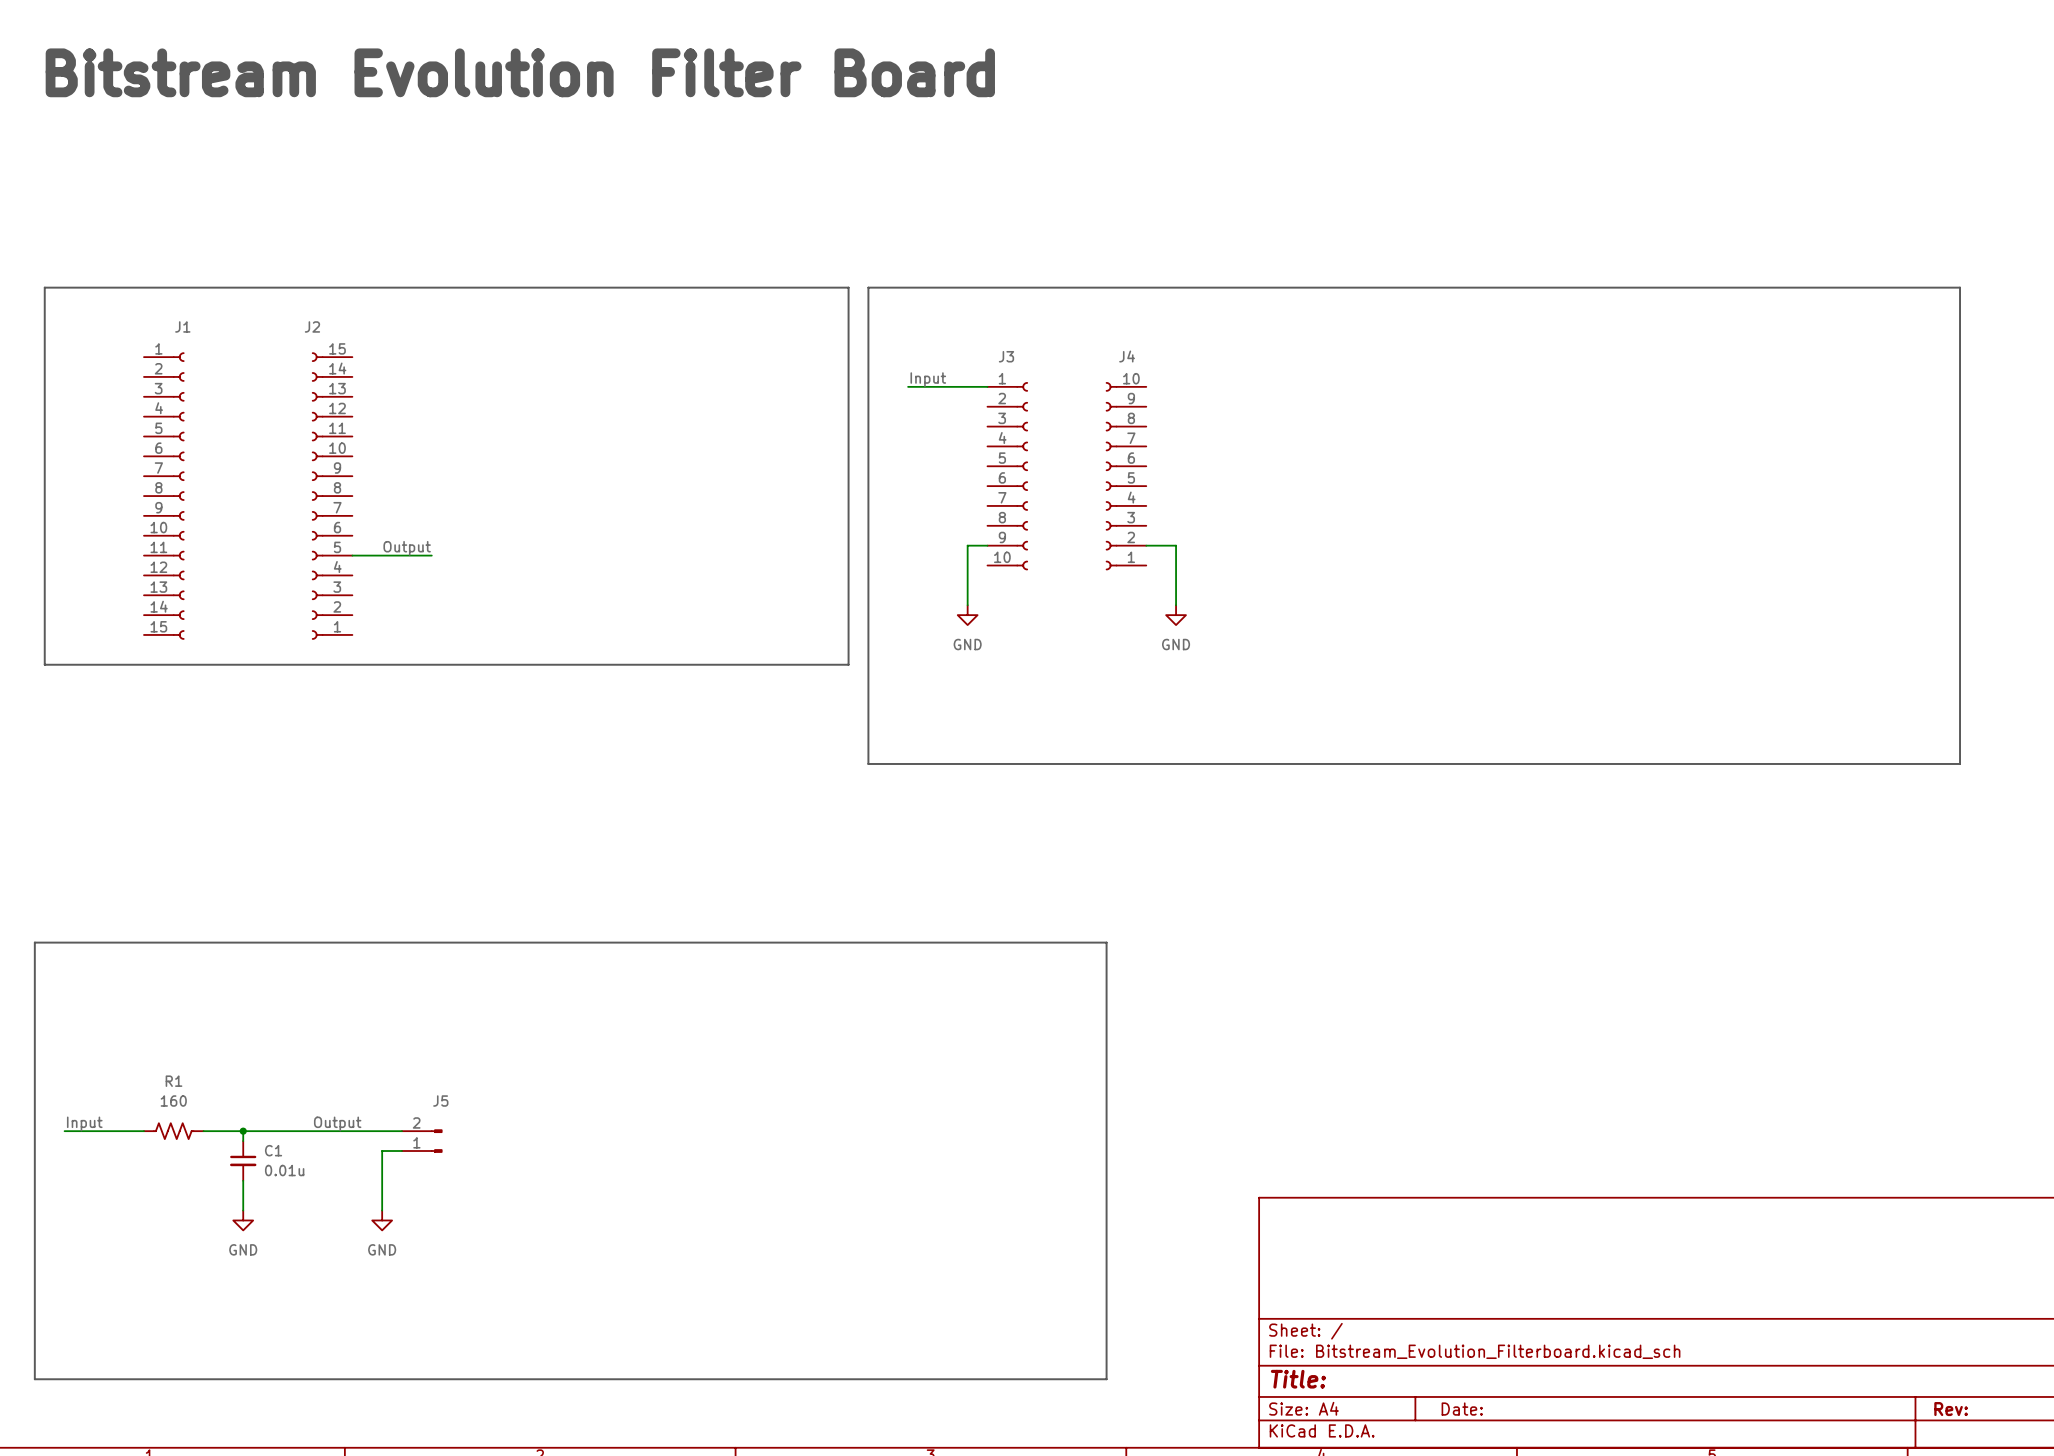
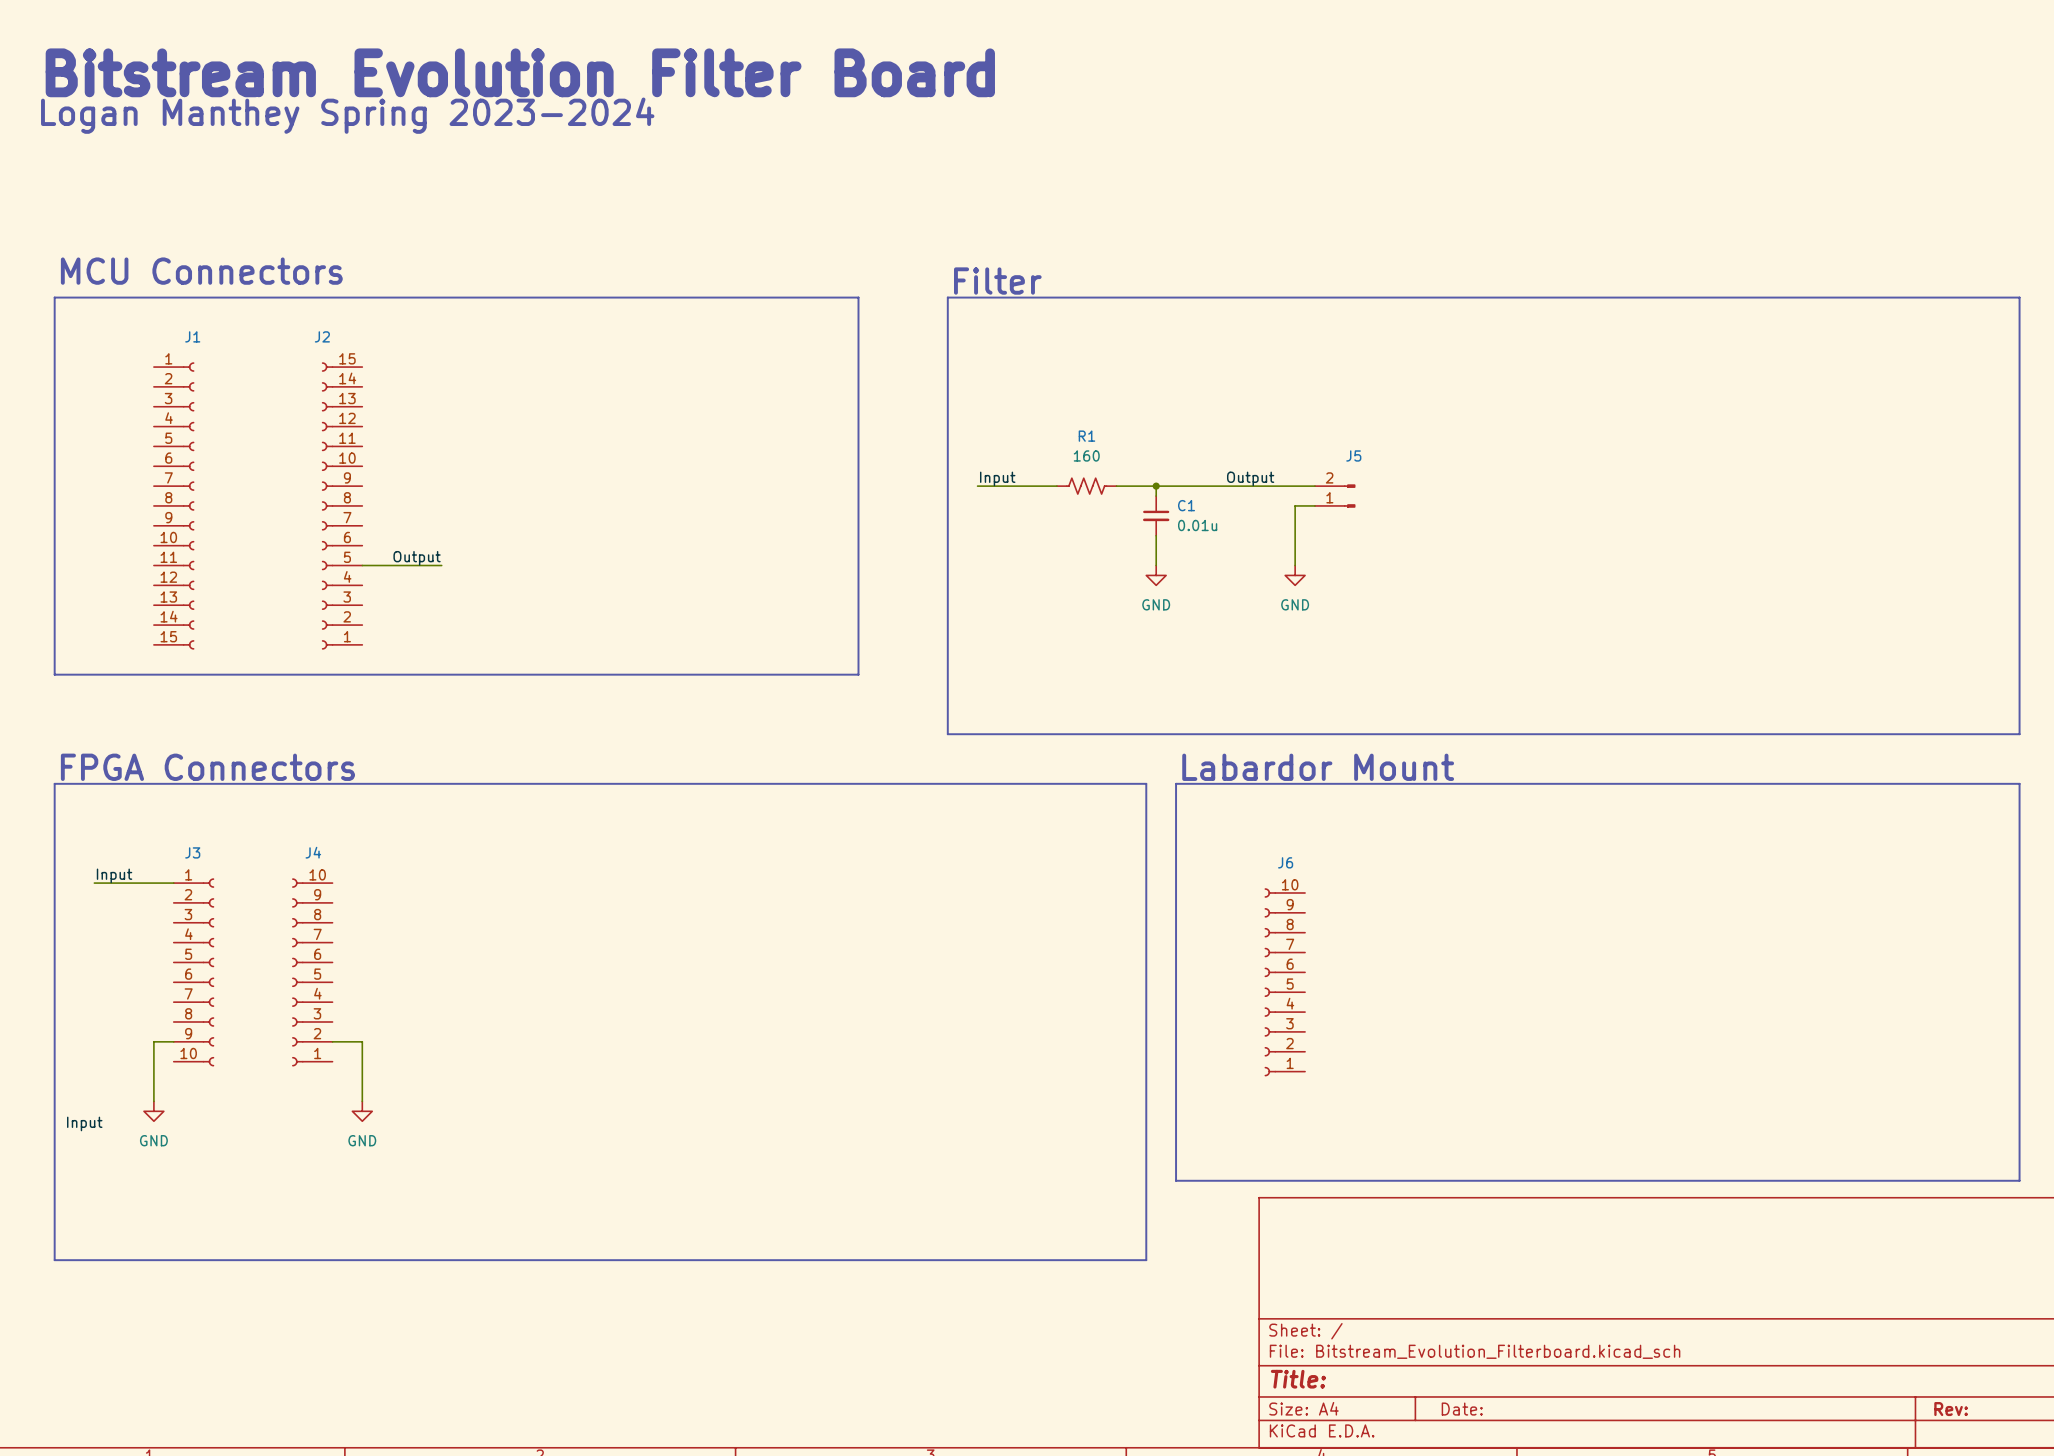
text: none -> Logan Manthey Spring 2023-2024 (347, 115)
text: none -> MCU Connectors (201, 271)
text: none -> Filter (997, 281)
line: (44, 287) (848, 287) (848, 664) (44, 664) (44, 287) -> (54, 297) (858, 297) (858, 674) (54, 674) (54, 297)
line: (868, 287) (1960, 287) (1960, 763) (868, 763) (868, 287) -> (947, 297) (947, 734) (2019, 734) (2019, 297) (947, 297)
label position: Input (928, 379) -> Input (997, 478)
wire: (908, 386) (987, 386) -> (977, 486) (1056, 486)
J3 position: (1007, 476) -> (193, 972)
J4 position: (1126, 476) -> (312, 972)
label: none -> Output (1250, 478)
wire: none -> (1116, 486) (1314, 486)
wire: none -> (1156, 486) (1156, 496)
junction: none -> (1156, 486)
J1 position: (164, 496) -> (174, 505)
J2 position: (332, 496) -> (342, 505)
wire: none -> (1314, 505) (1295, 505) (1295, 565)
wire: none -> (1156, 535) (1156, 565)
wire: (987, 545) (967, 545) (967, 605) -> none
wire: (1146, 545) (1176, 545) (1176, 605) -> none
label position: Output (407, 548) -> Output (417, 558)
wire: (352, 555) (431, 555) -> (362, 565) (441, 565)
power symbol: none -> GND (1295, 575)
power symbol: GND (967, 615) -> none
power symbol position: GND (1176, 615) -> GND (1156, 575)
text: none -> FPGA Connectors (207, 767)
text: none -> Labardor Mount (1318, 767)
line: none -> (1176, 783) (2019, 783) (2019, 1180) (1176, 1180) (1176, 783)
label: none -> Input (114, 875)
wire: none -> (94, 883) (173, 883)
line: (34, 942) (1106, 942) (1106, 1379) (34, 1379) (34, 942) -> (54, 783) (54, 1260) (1146, 1260) (1146, 783) (54, 783)
J6: none -> (1284, 982)
wire: none -> (173, 1041) (153, 1041) (153, 1101)
wire: none -> (332, 1041) (362, 1041) (362, 1101)
power symbol: none -> GND (153, 1111)
power symbol: none -> GND (362, 1111)
label: Output (337, 1123) -> none
wire: (64, 1131) (143, 1131) -> none
R1 position: (173, 1131) -> (1086, 486)
wire: (203, 1131) (402, 1131) -> none
wire: (243, 1131) (243, 1141) -> none
junction: (243, 1131) -> none
J5 position: (422, 1141) -> (1335, 496)
wire: (402, 1151) (382, 1151) (382, 1210) -> none
C1 position: (243, 1160) -> (1156, 515)
wire: (243, 1180) (243, 1210) -> none
power symbol: GND (243, 1220) -> none
power symbol: GND (382, 1220) -> none

